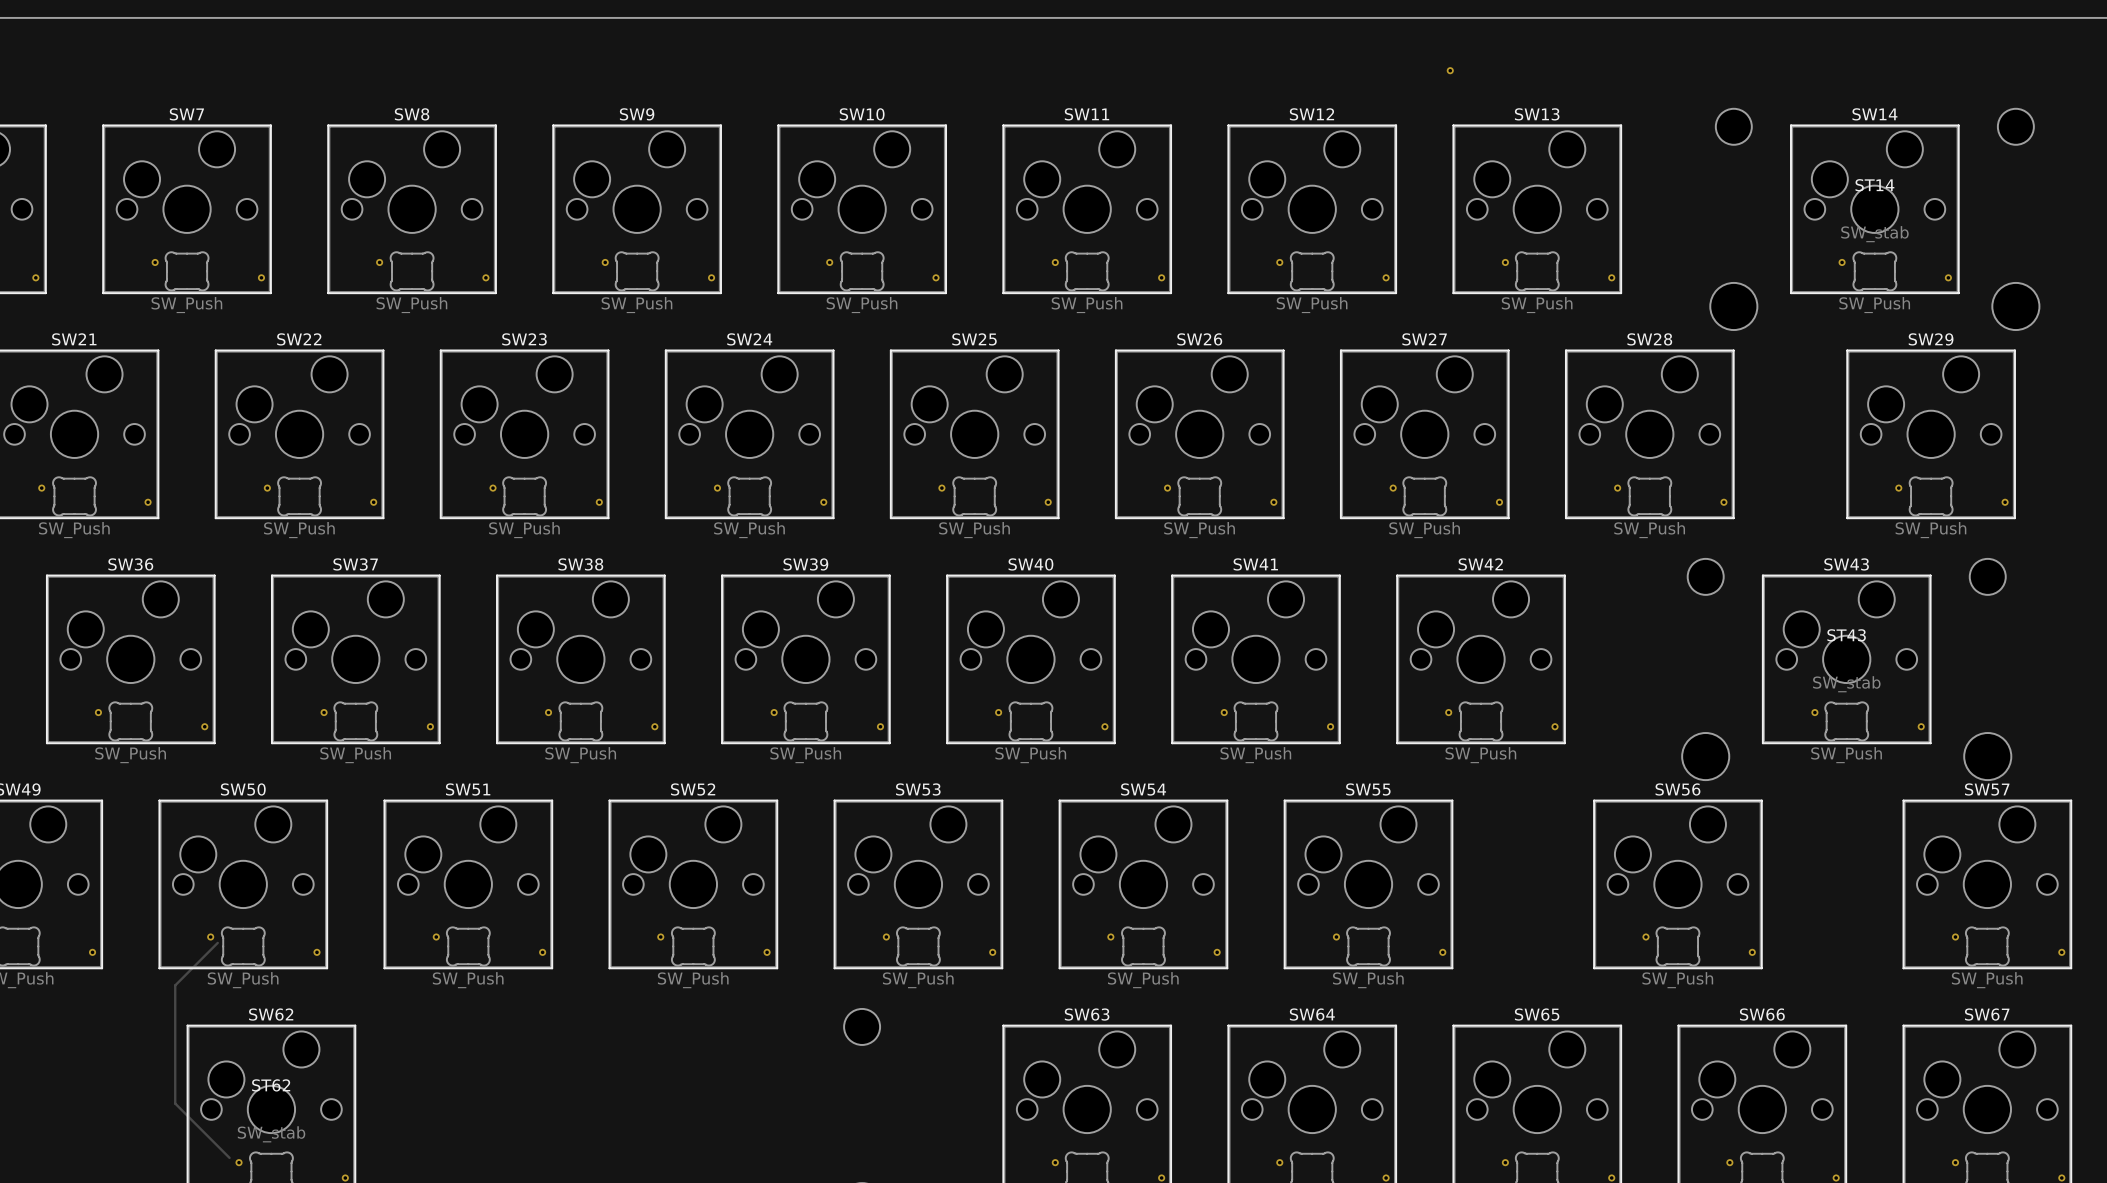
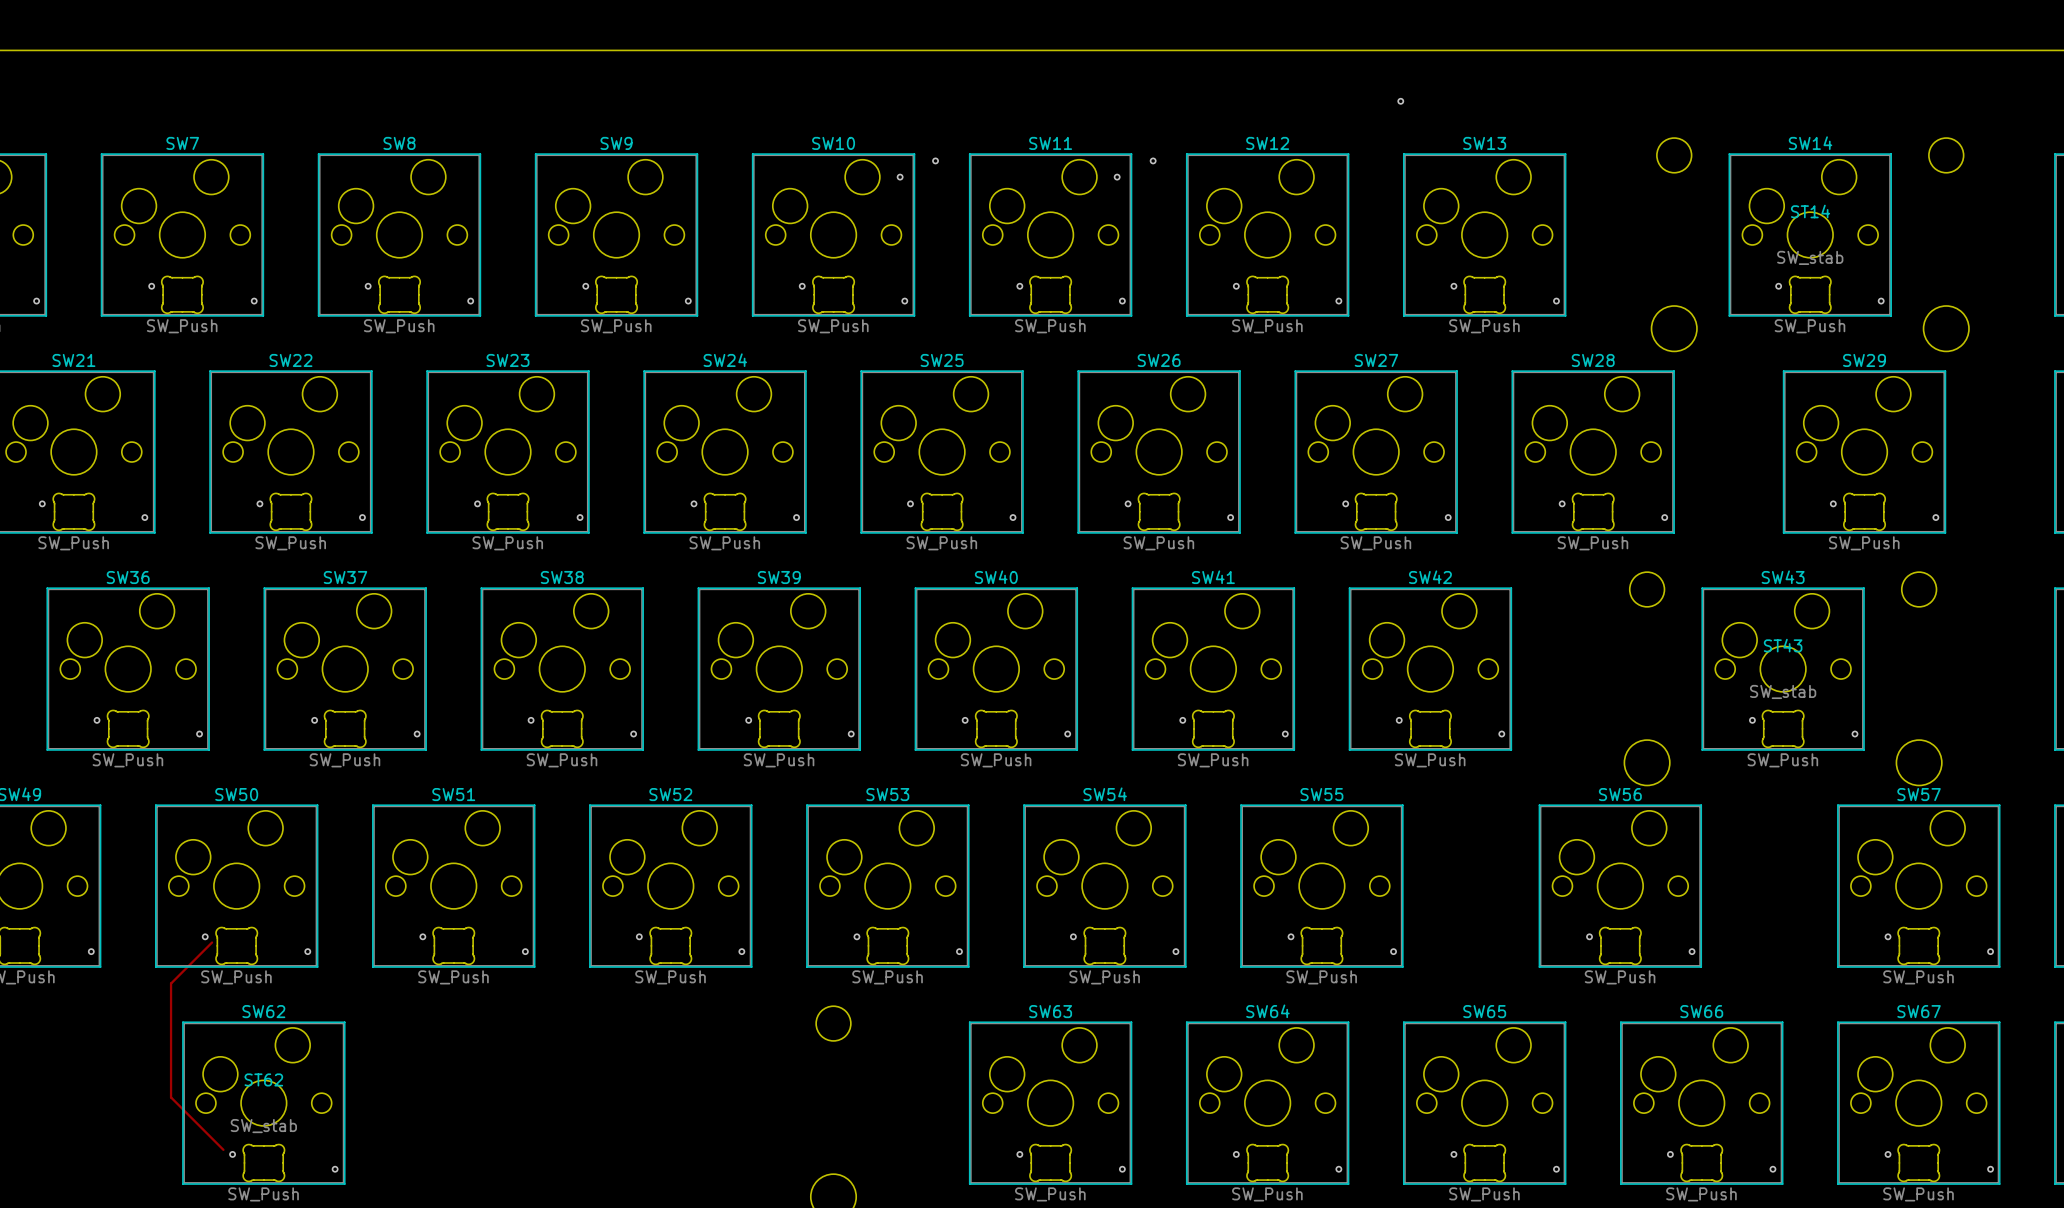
via: none -> (935, 160)
via: none -> (1153, 160)
via: none -> (900, 177)
via: none -> (1117, 177)

